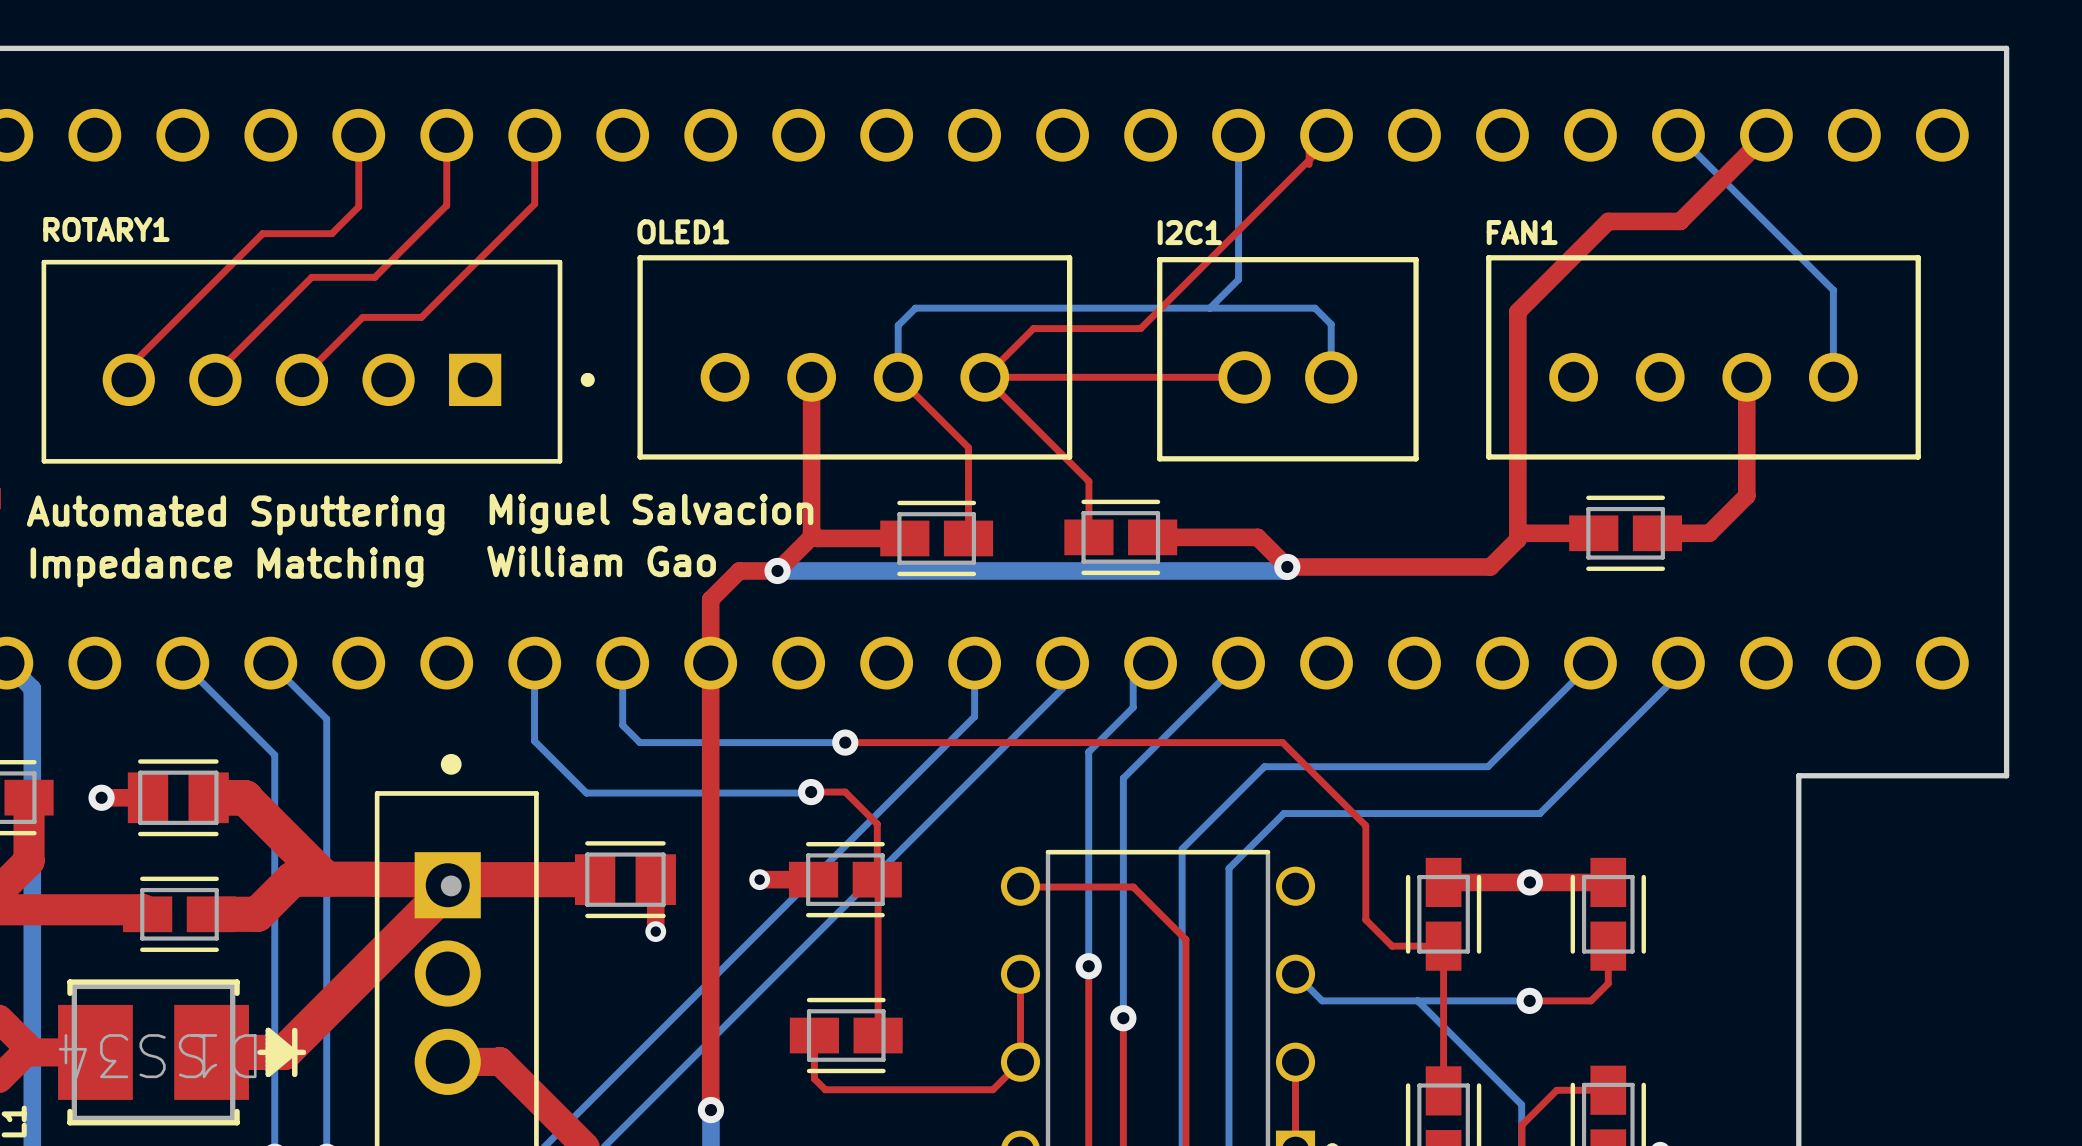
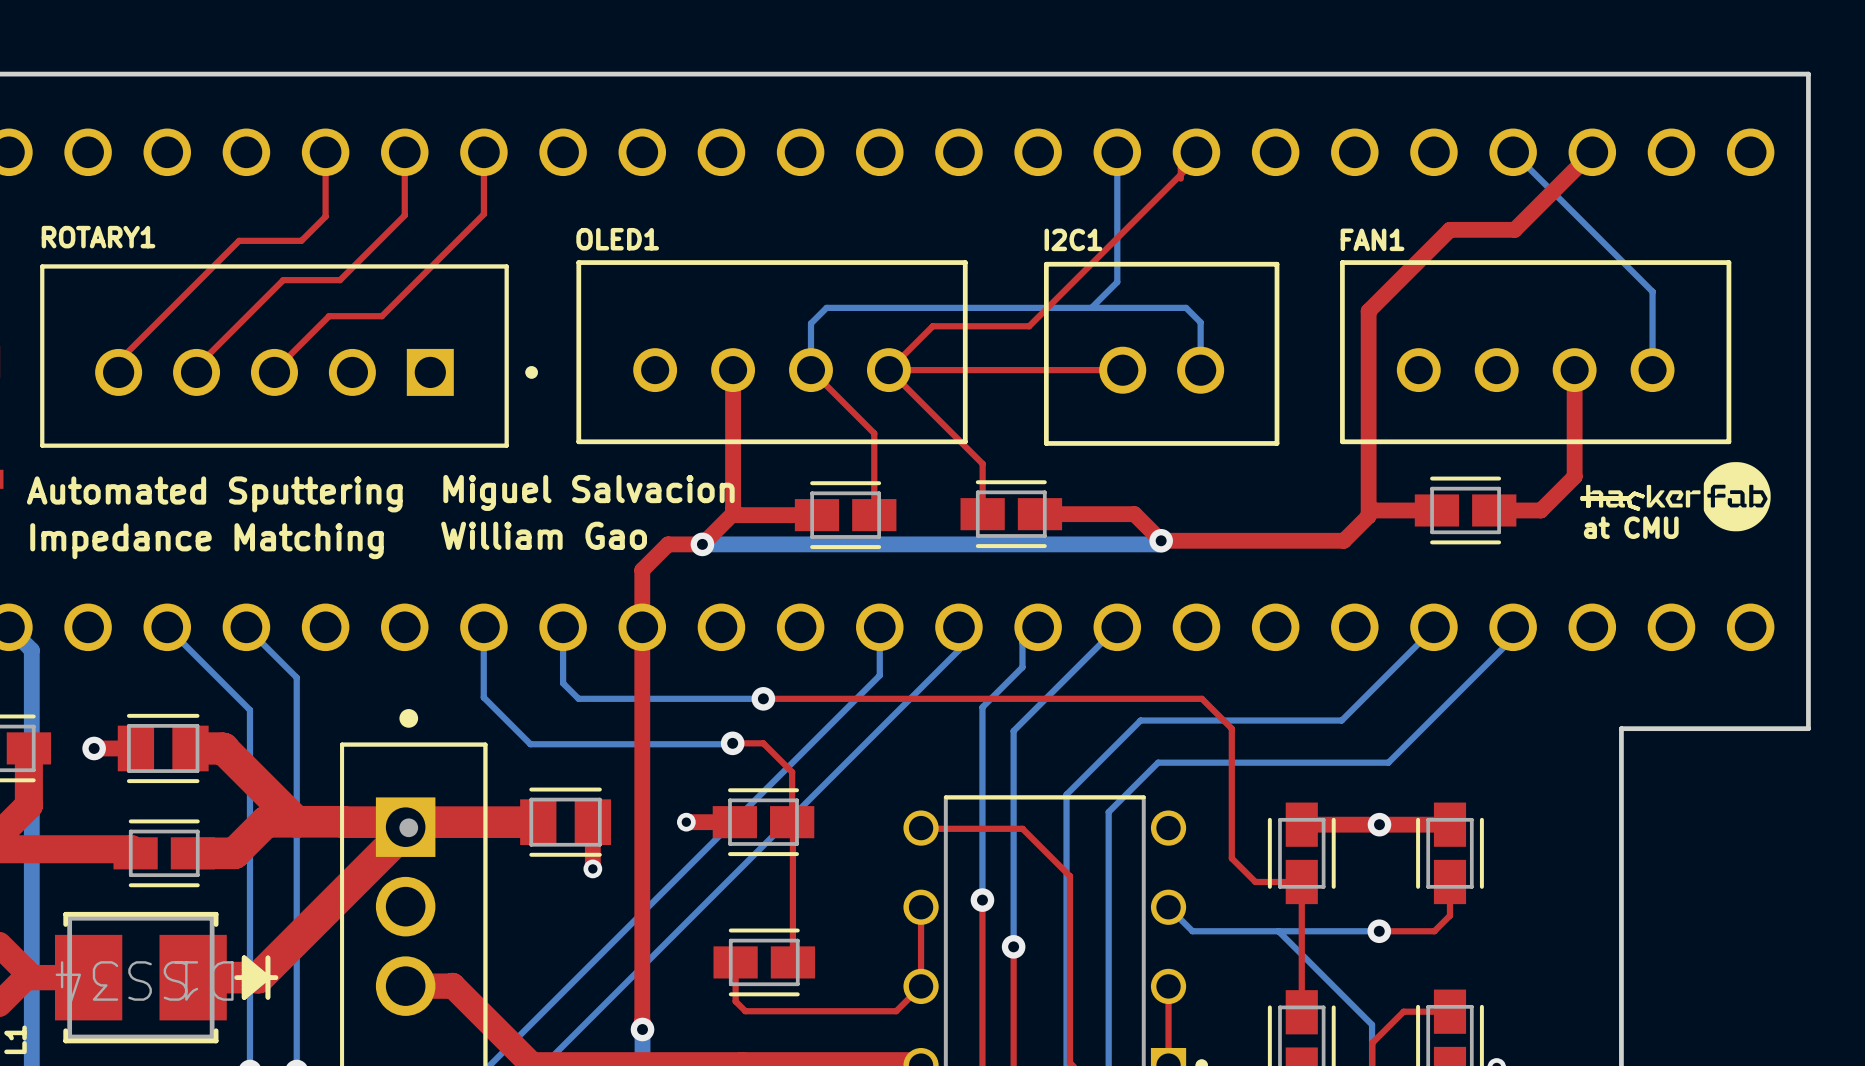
drawing: none -> [1580, 462, 1771, 532]
text: none -> at CMU (1631, 527)
top track: (1282, 742) (1365, 825) -> (1156, 698) (1201, 698) (1231, 728) (1231, 773)

